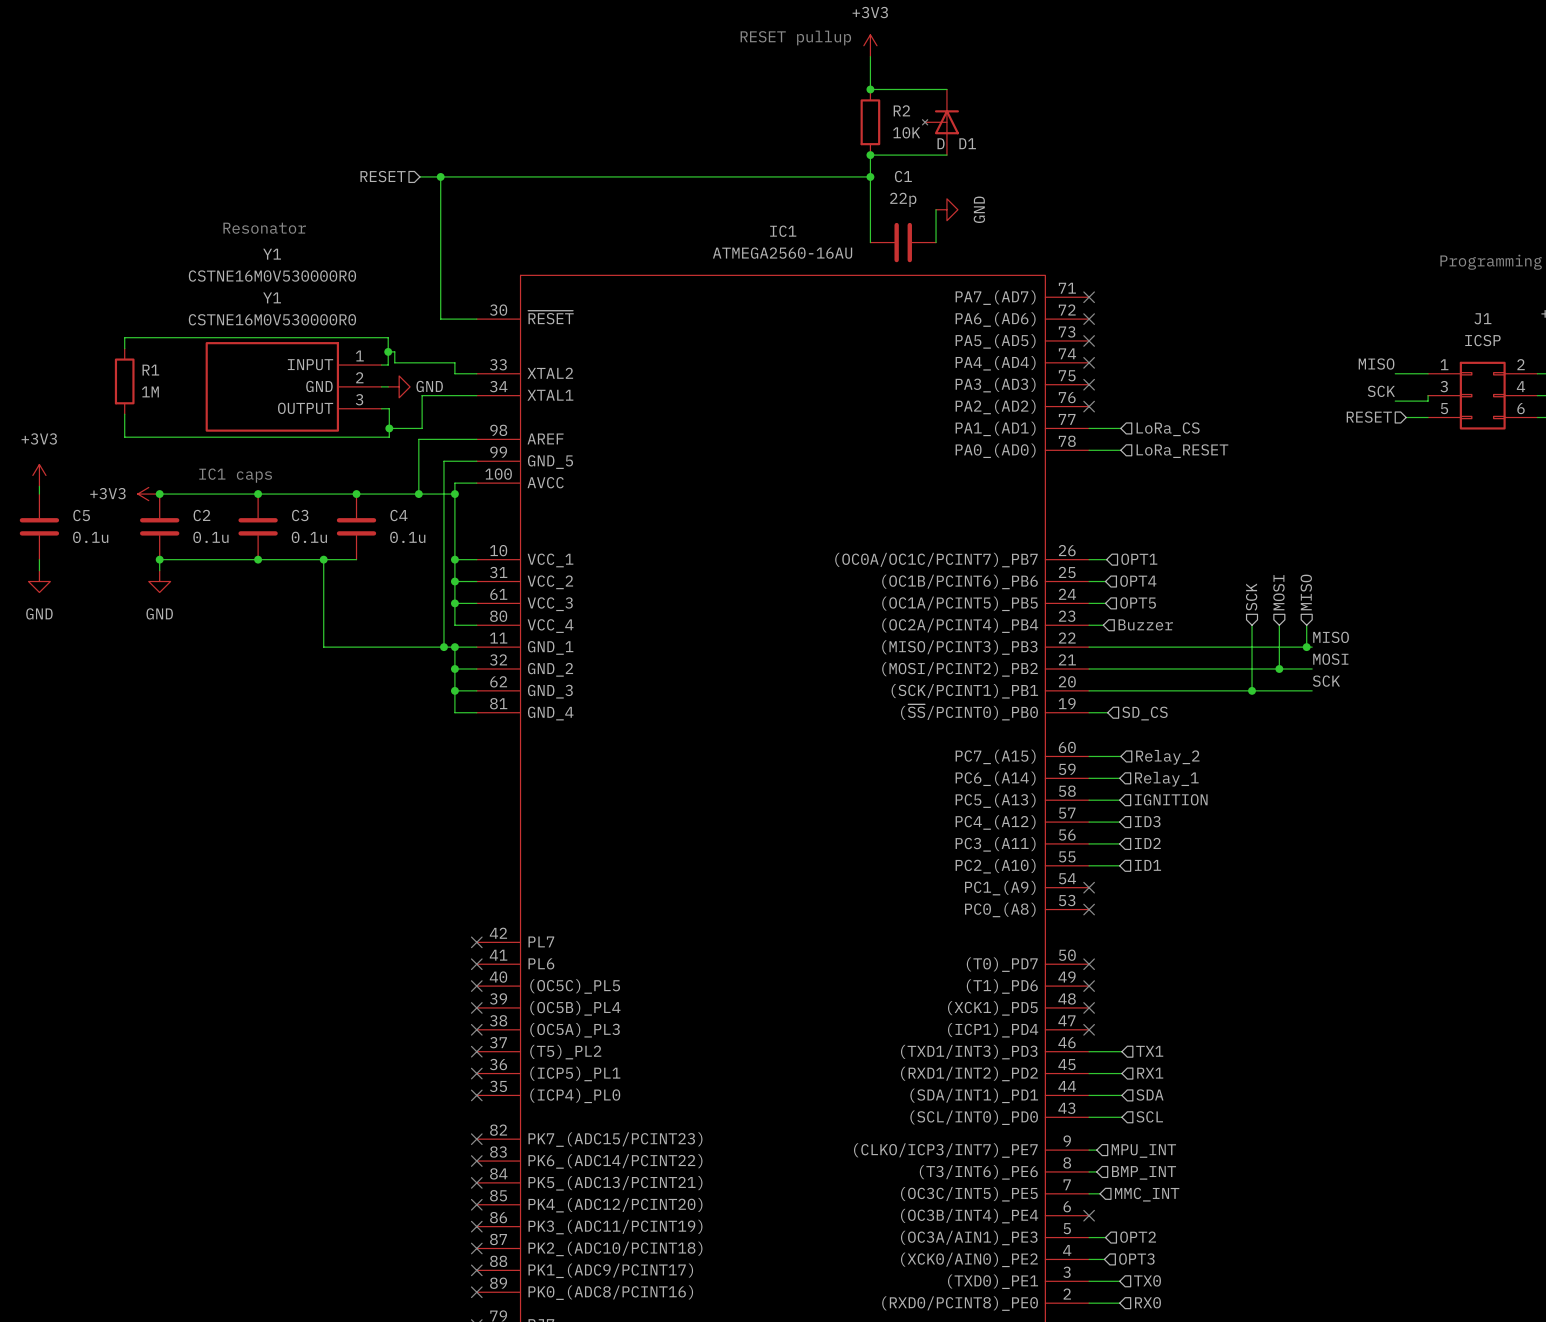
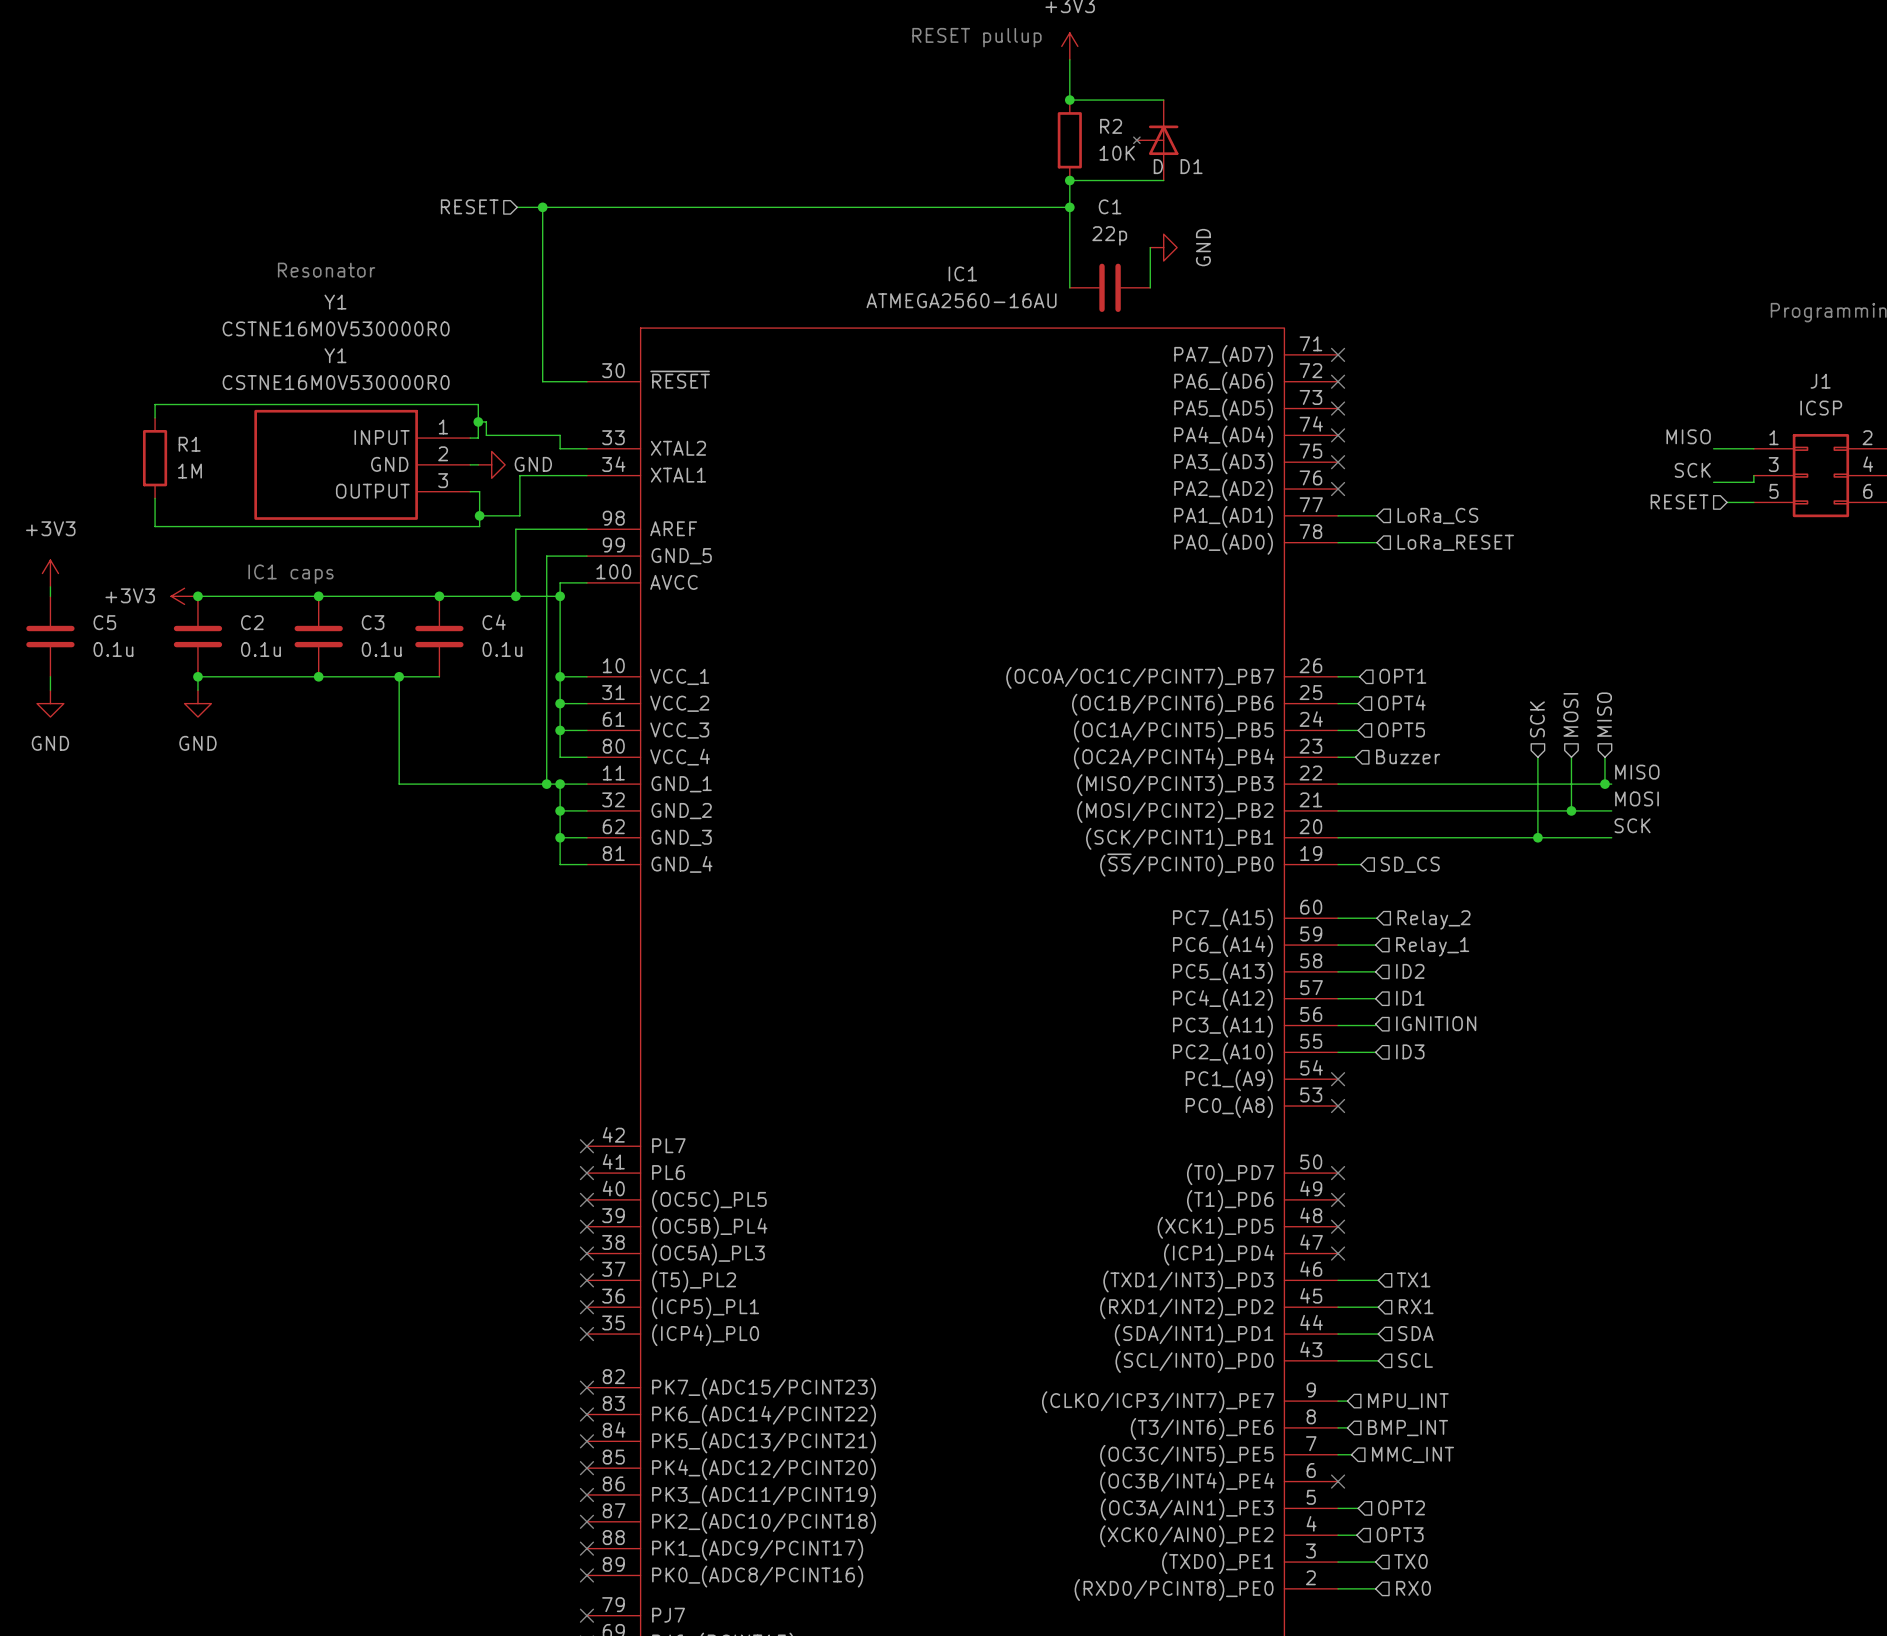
hierarchical label: IGNITION (1171, 799) -> ID2 (1410, 971)
hierarchical label: ID3 (1147, 821) -> ID1 (1410, 998)
hierarchical label: ID2 (1147, 843) -> IGNITION (1436, 1023)
hierarchical label: ID1 (1147, 865) -> ID3 (1410, 1051)

